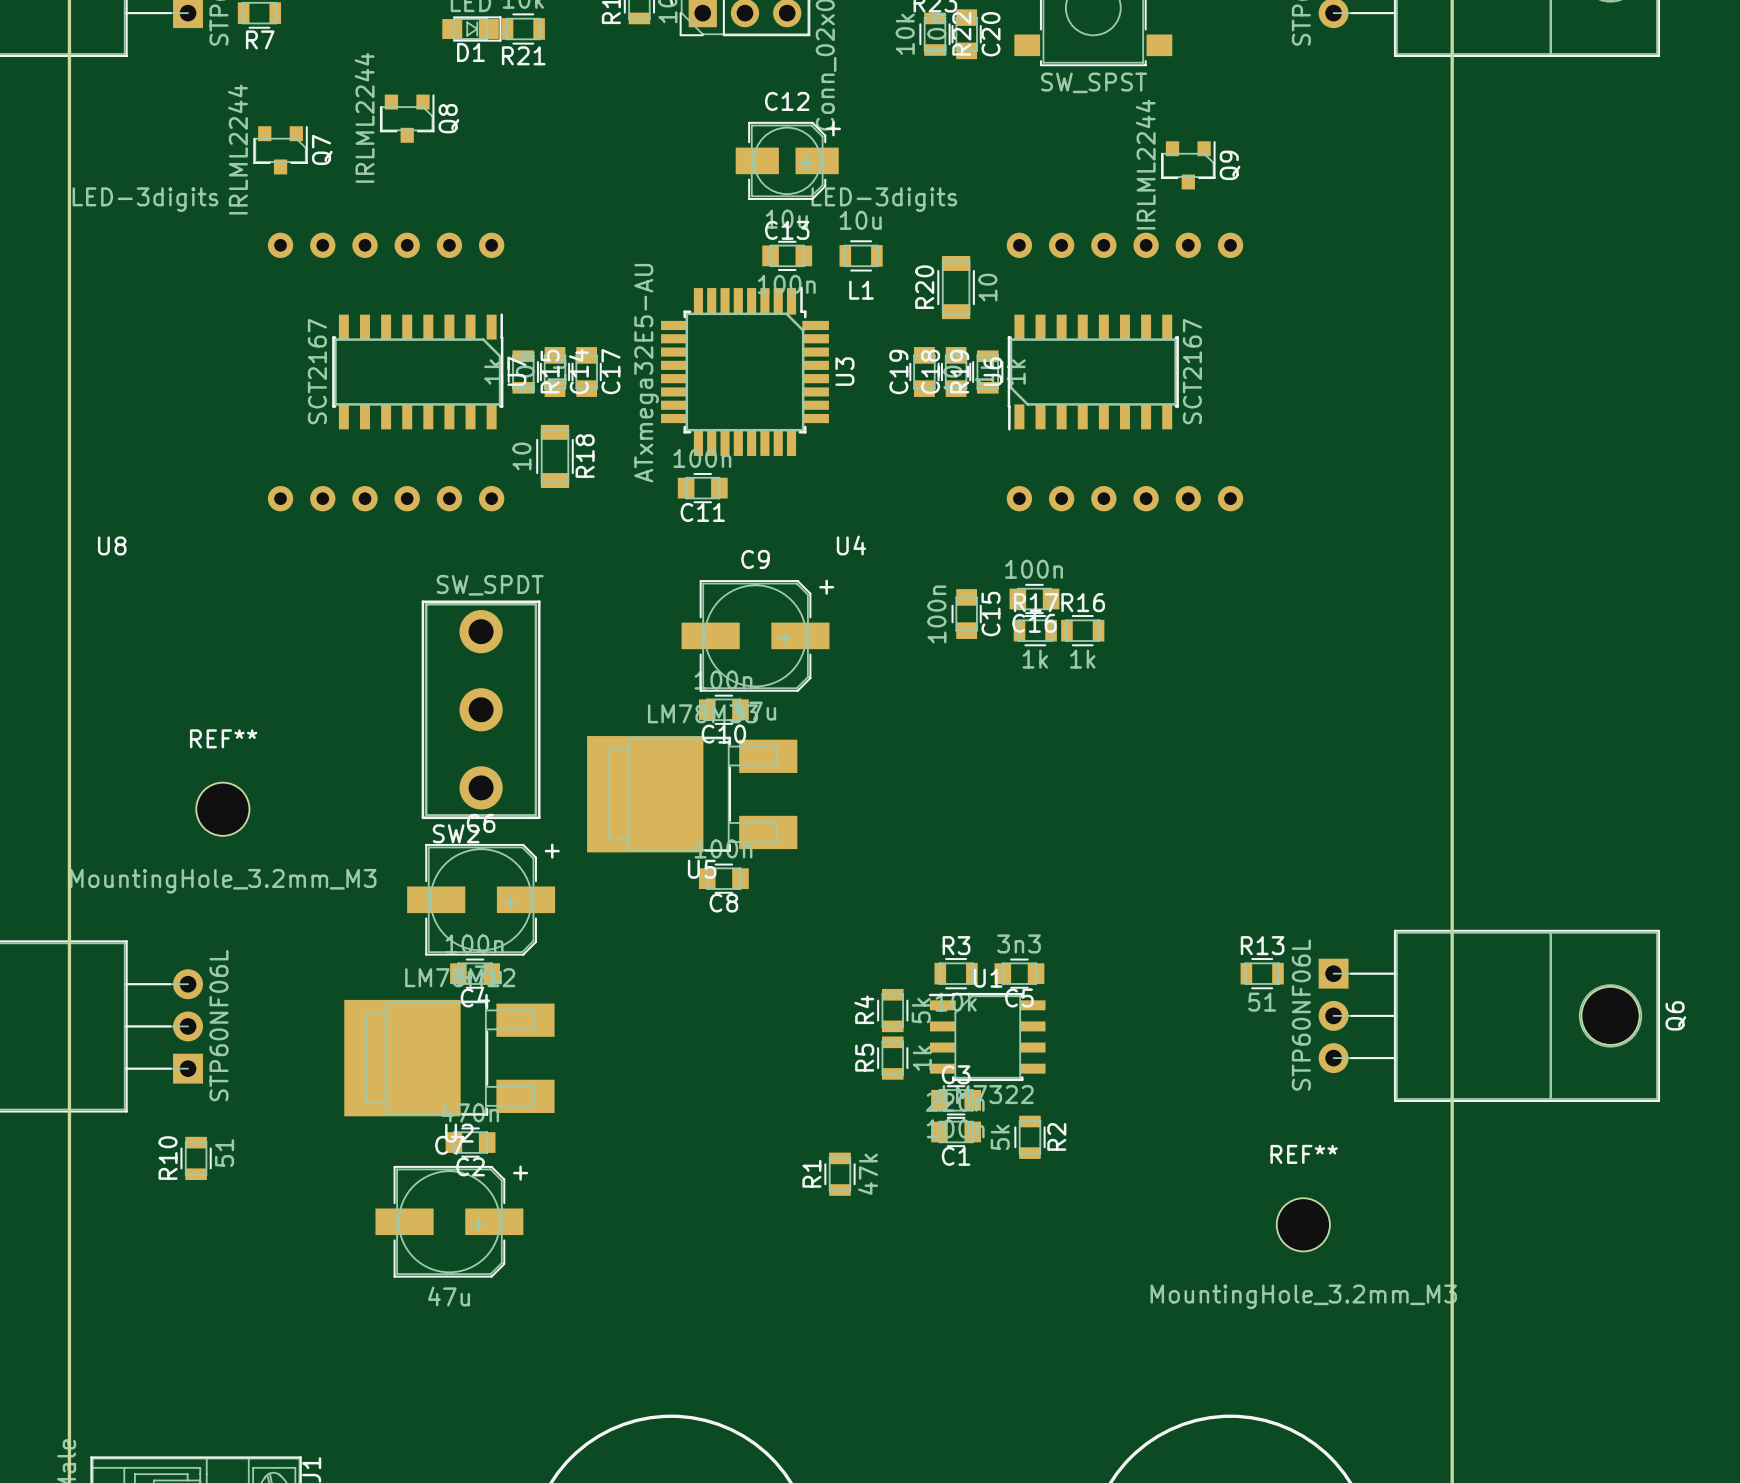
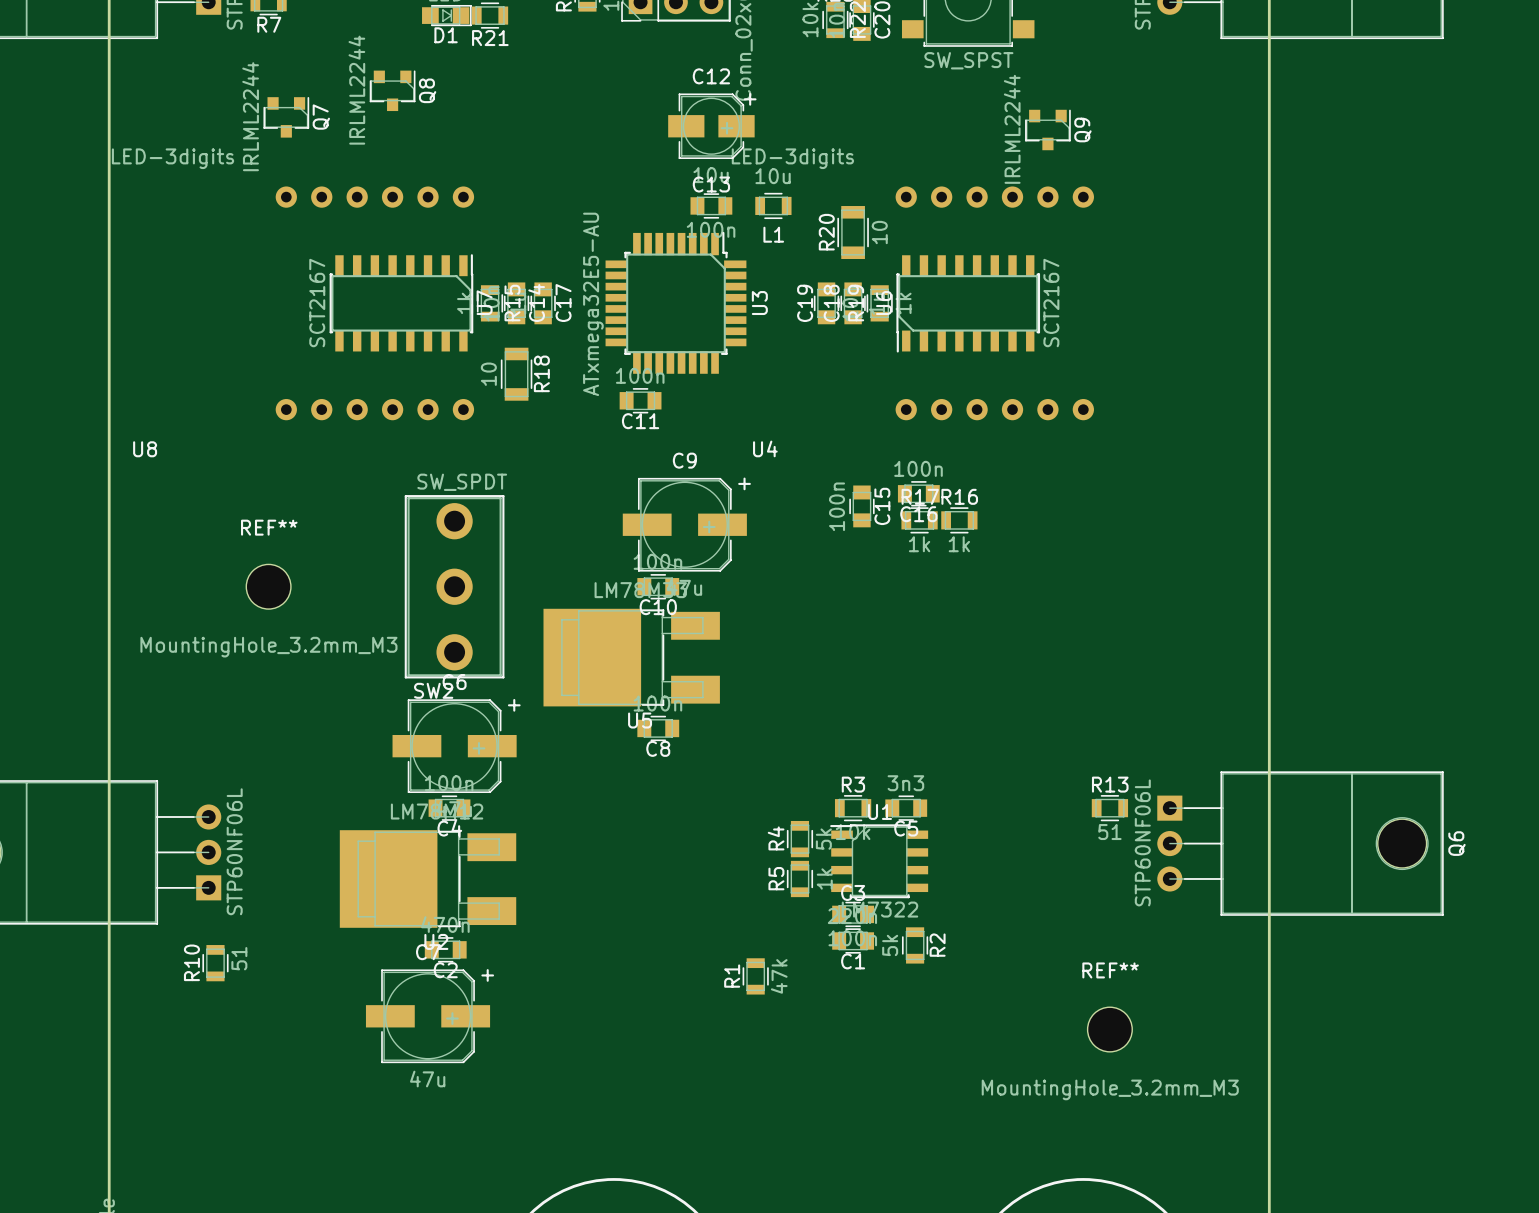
REF** position: (222, 809) -> (268, 586)
REF** position: (1303, 1224) -> (1109, 1029)

